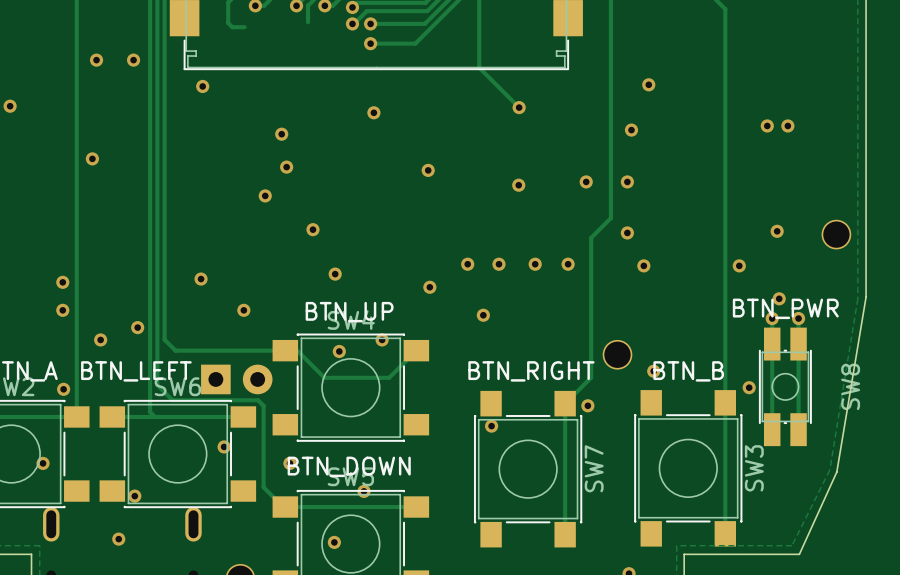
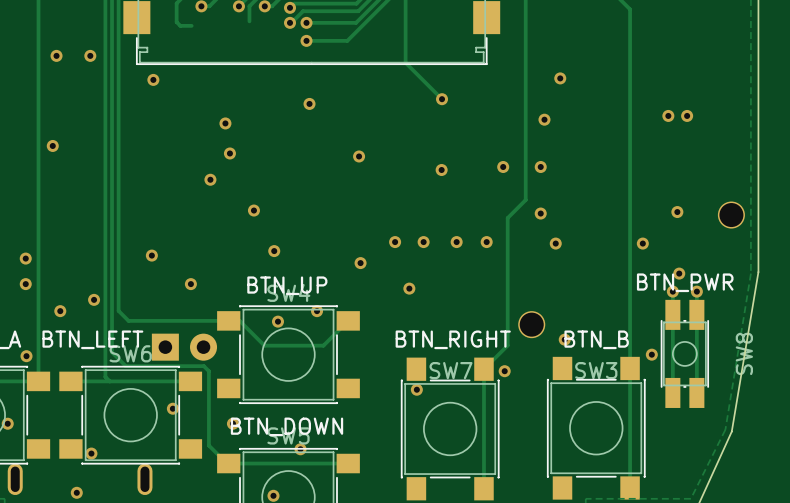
SW7 name rotation: 0° (594, 468) -> 90° clockwise (451, 370)
SW7 name position: SW7 (594, 468) -> SW7 (451, 370)
SW3 name rotation: 0° (754, 468) -> 90° clockwise (596, 370)
SW3 name position: SW3 (754, 468) -> SW3 (596, 370)

